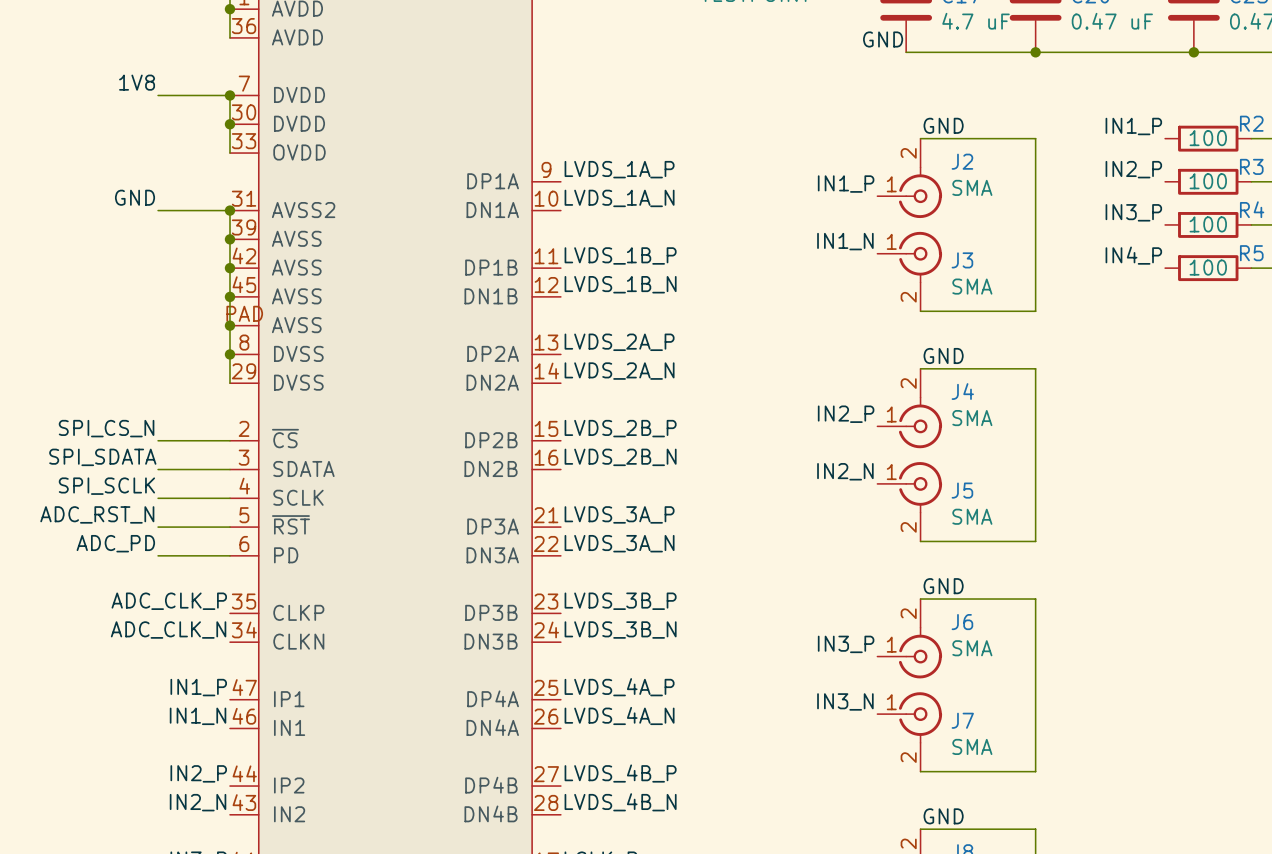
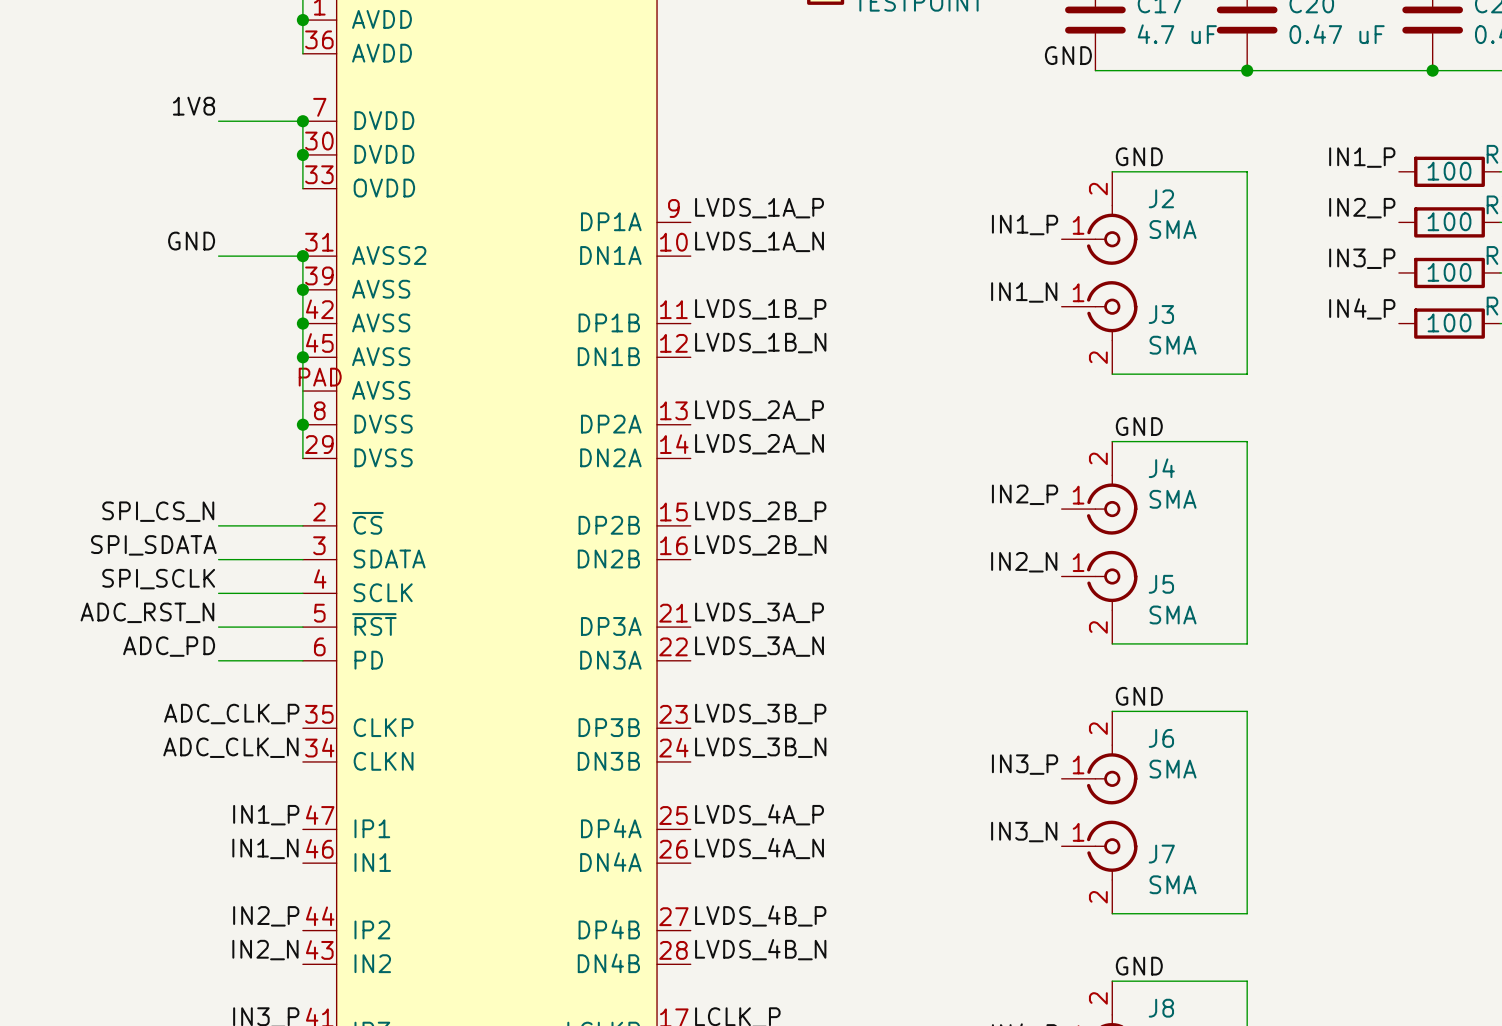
junction: (229, 325) -> none

